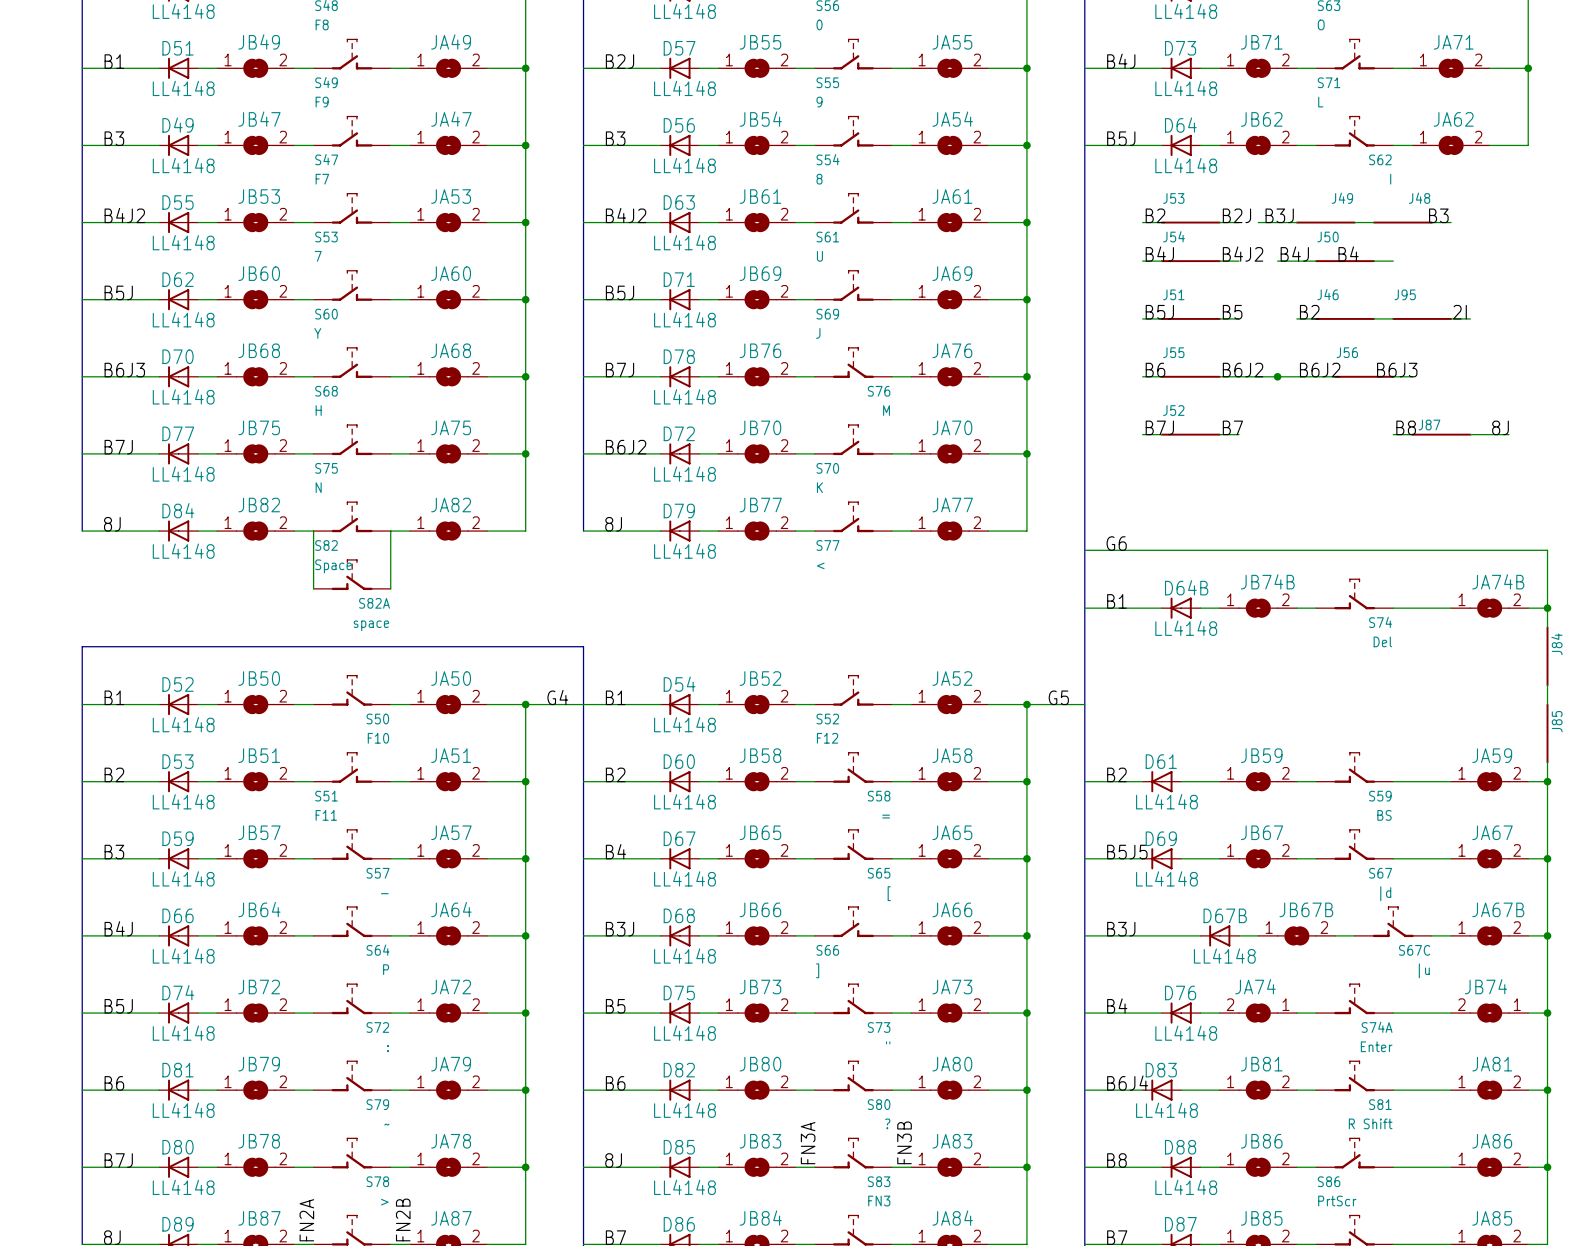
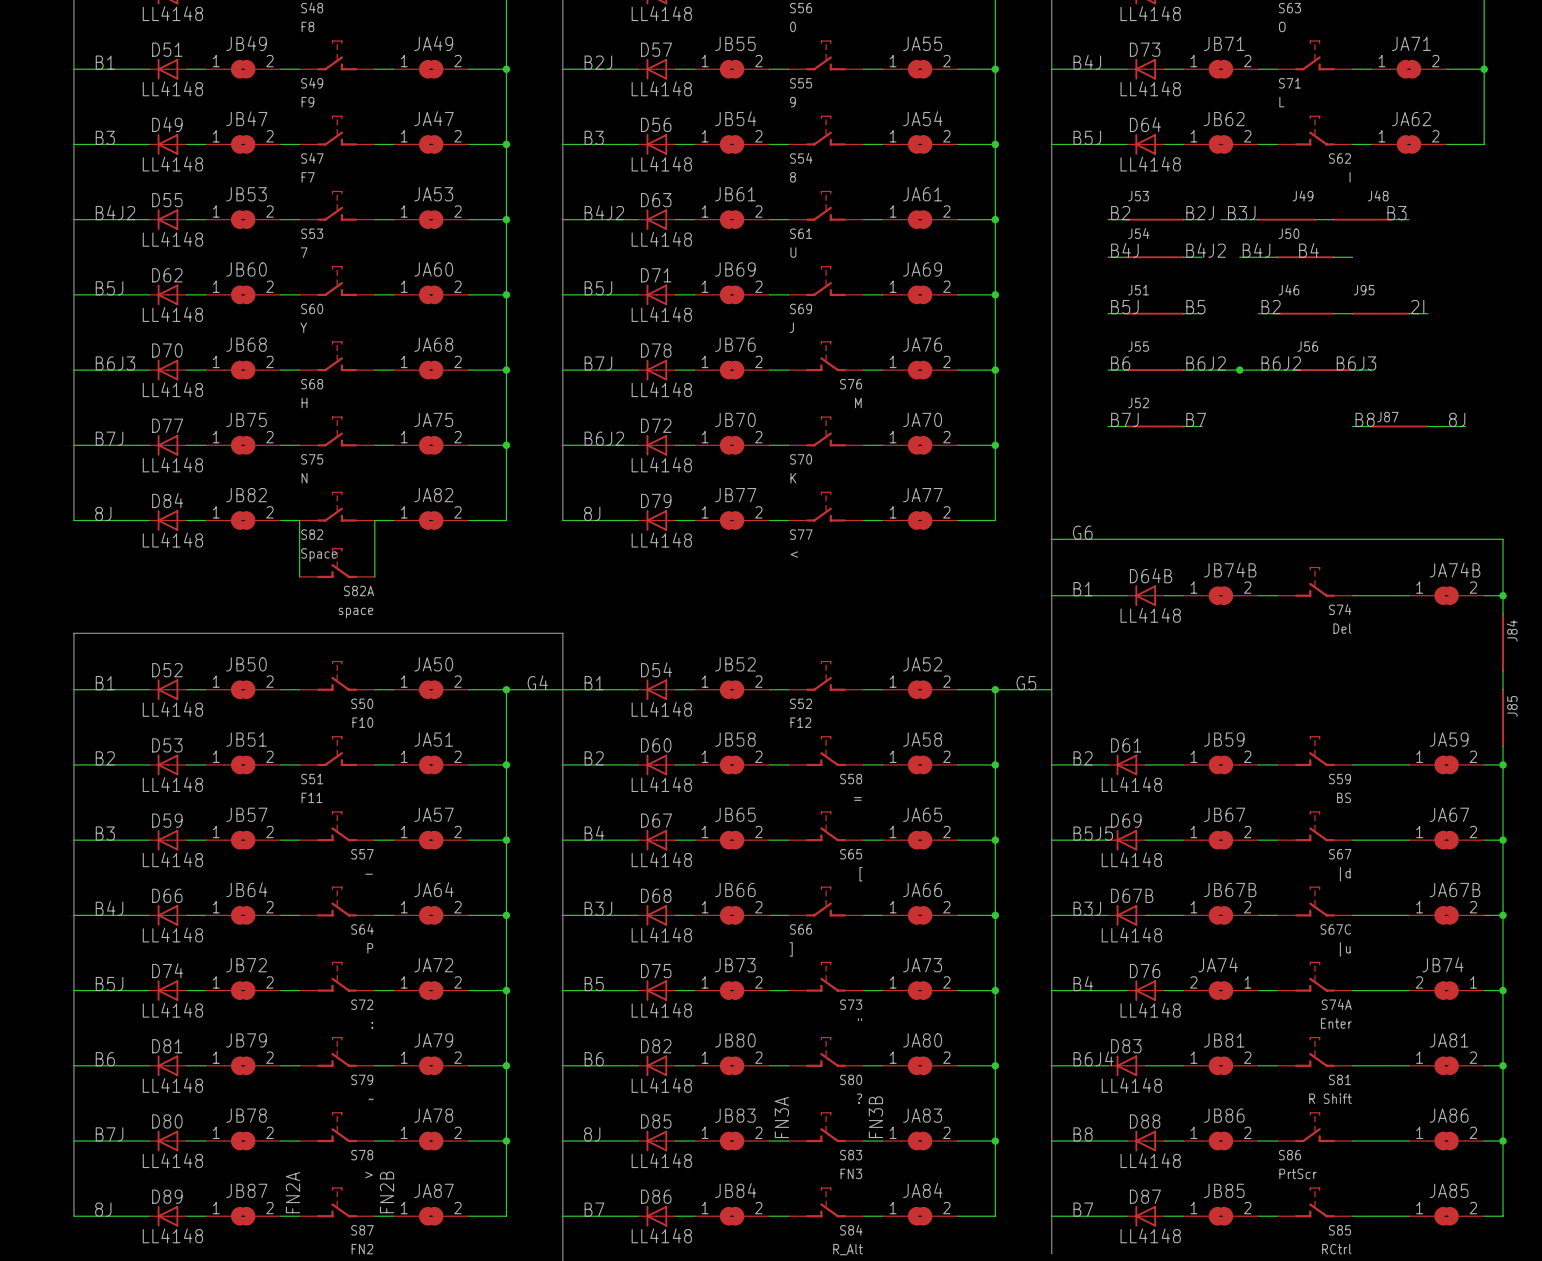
S67C position: (1393, 921) -> (1314, 901)
D67B position: (1219, 935) -> (1126, 915)
JB67B position: (1296, 935) -> (1220, 915)

